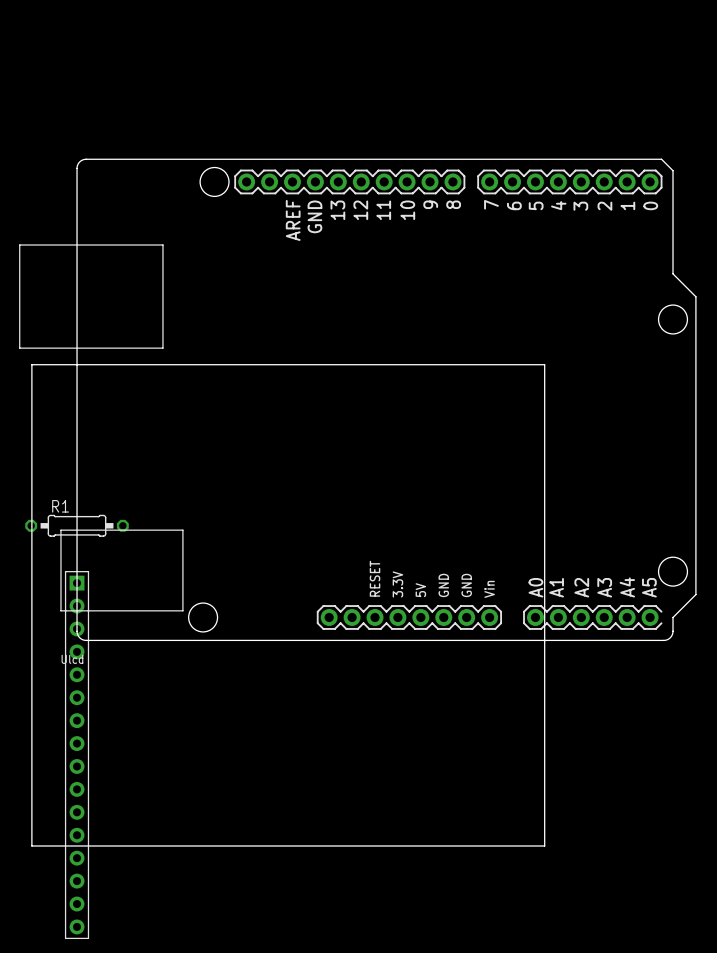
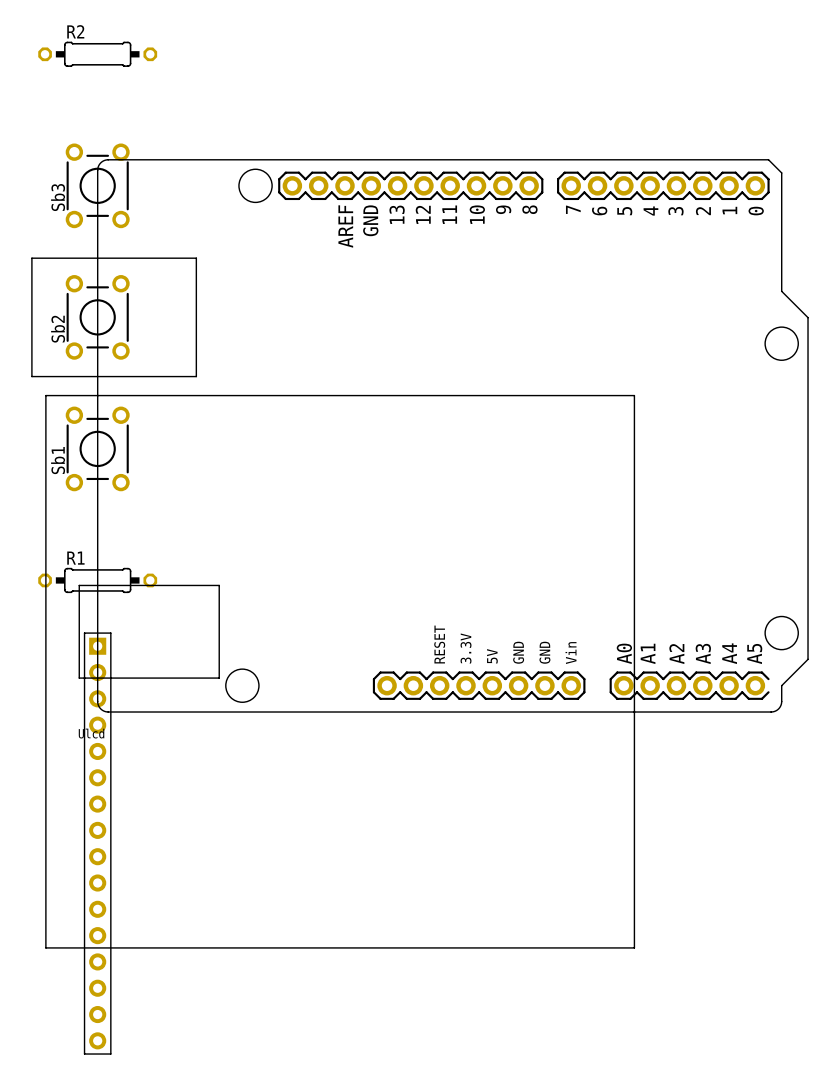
R2: none -> (97, 54)
Sb3: none -> (97, 185)
Sb2: none -> (97, 317)
Sb1: none -> (97, 448)

